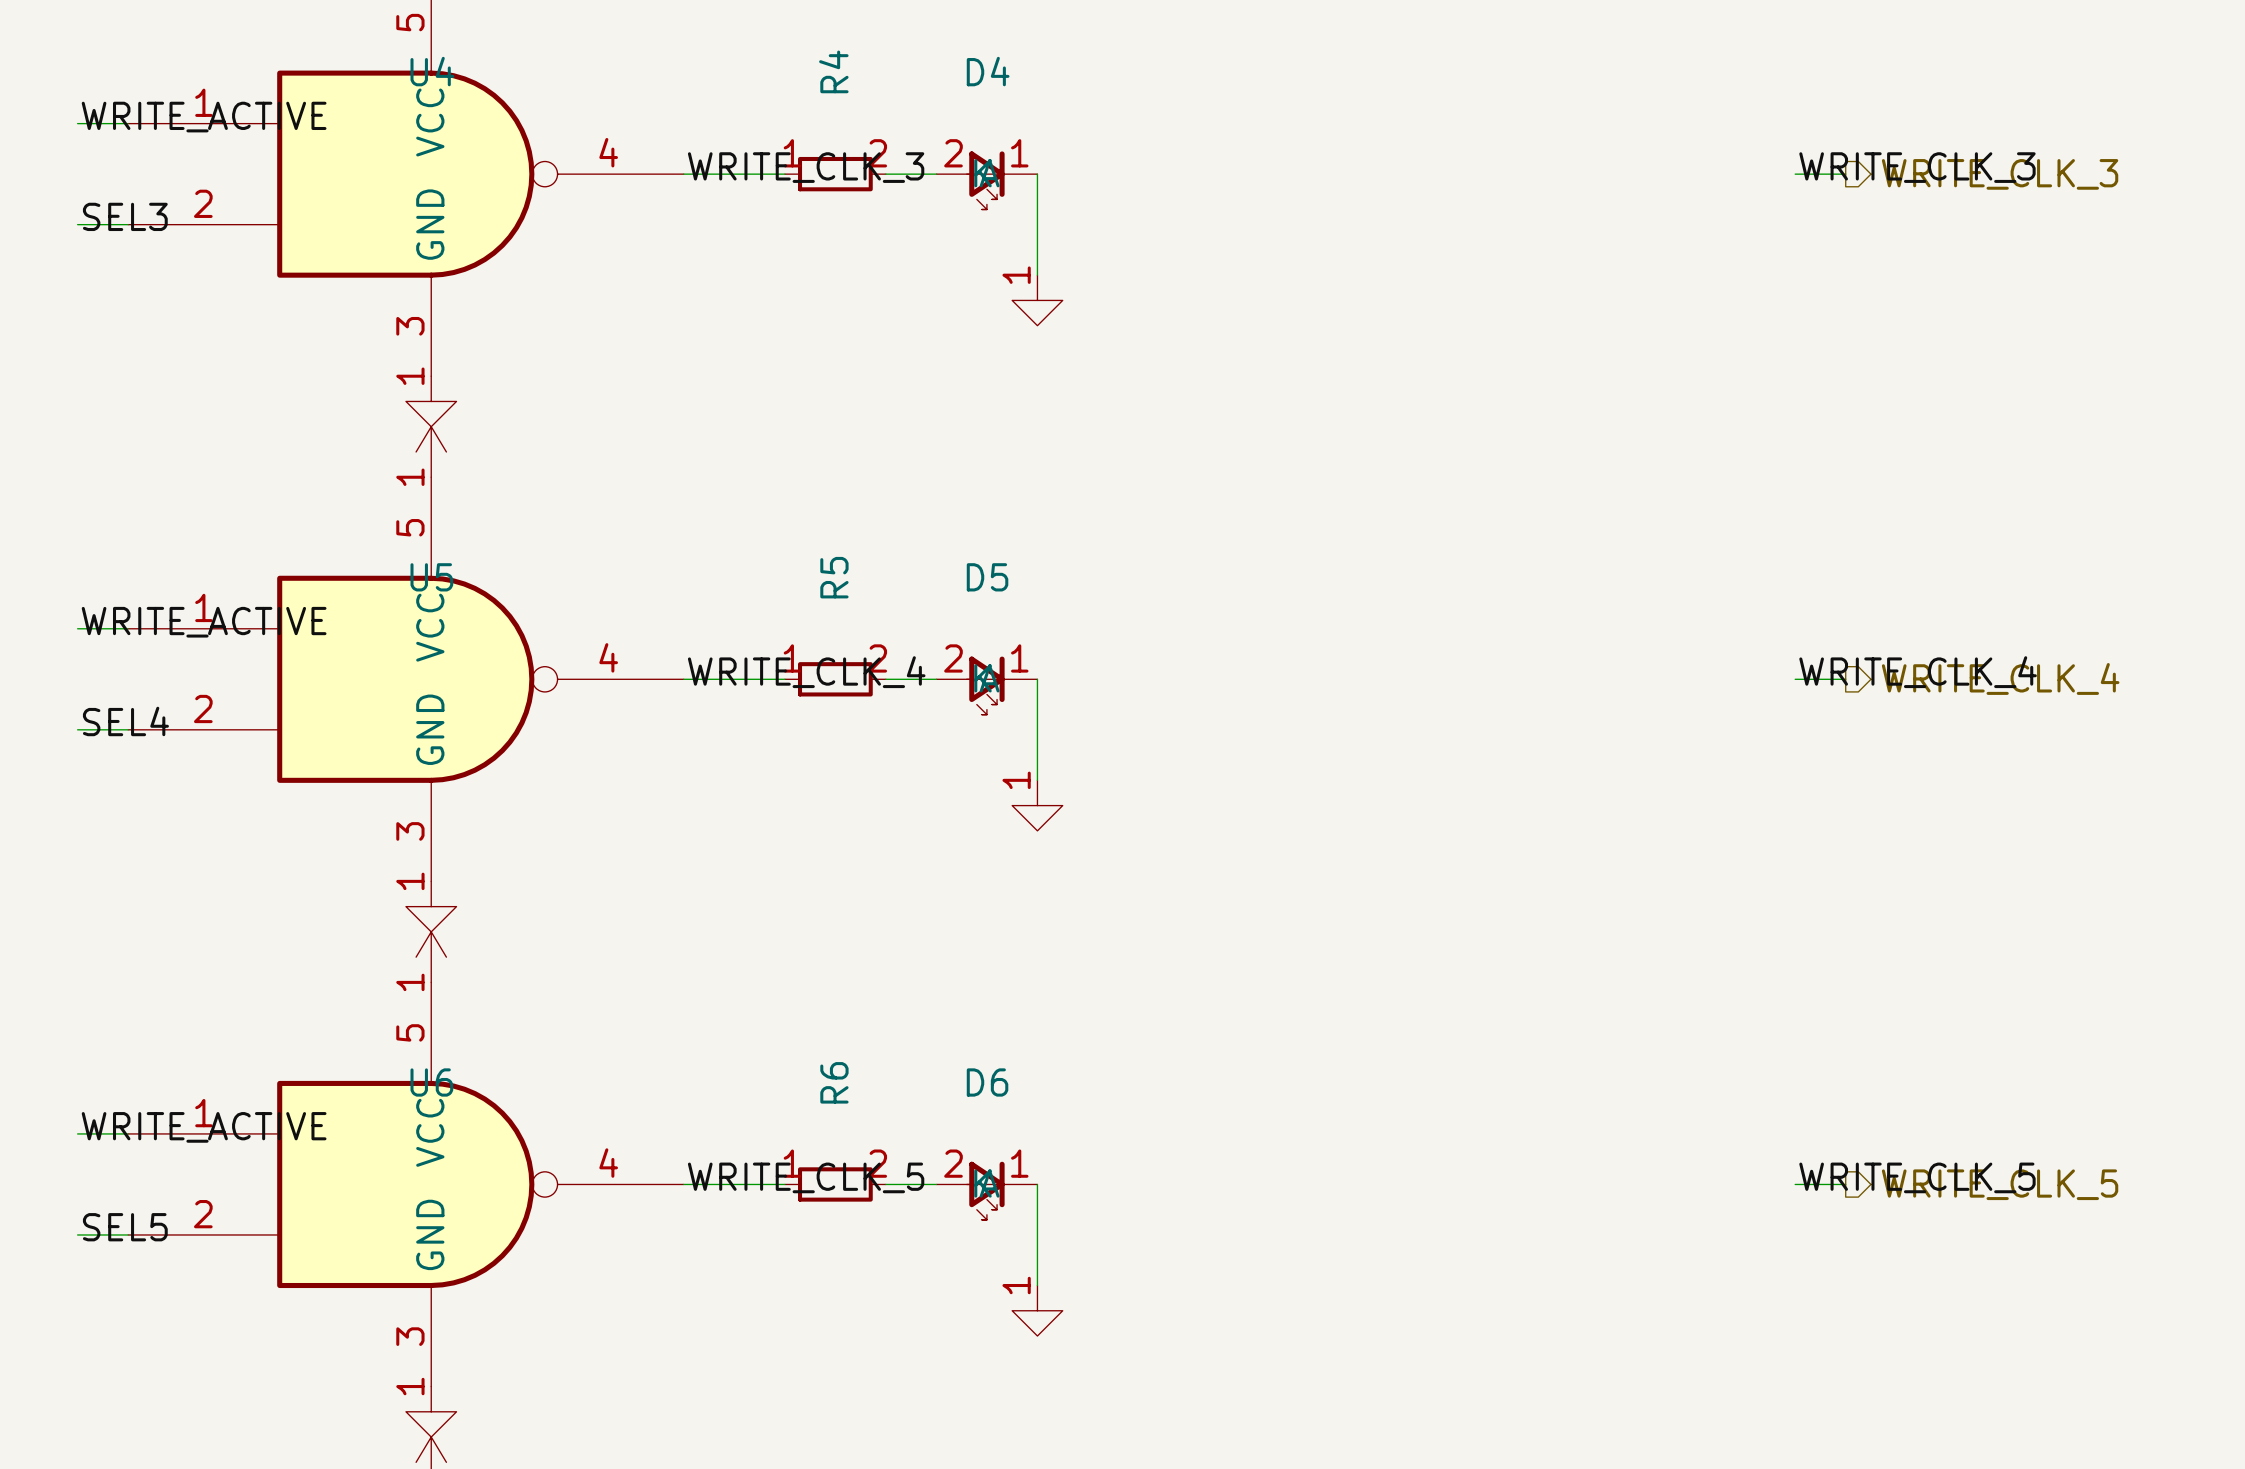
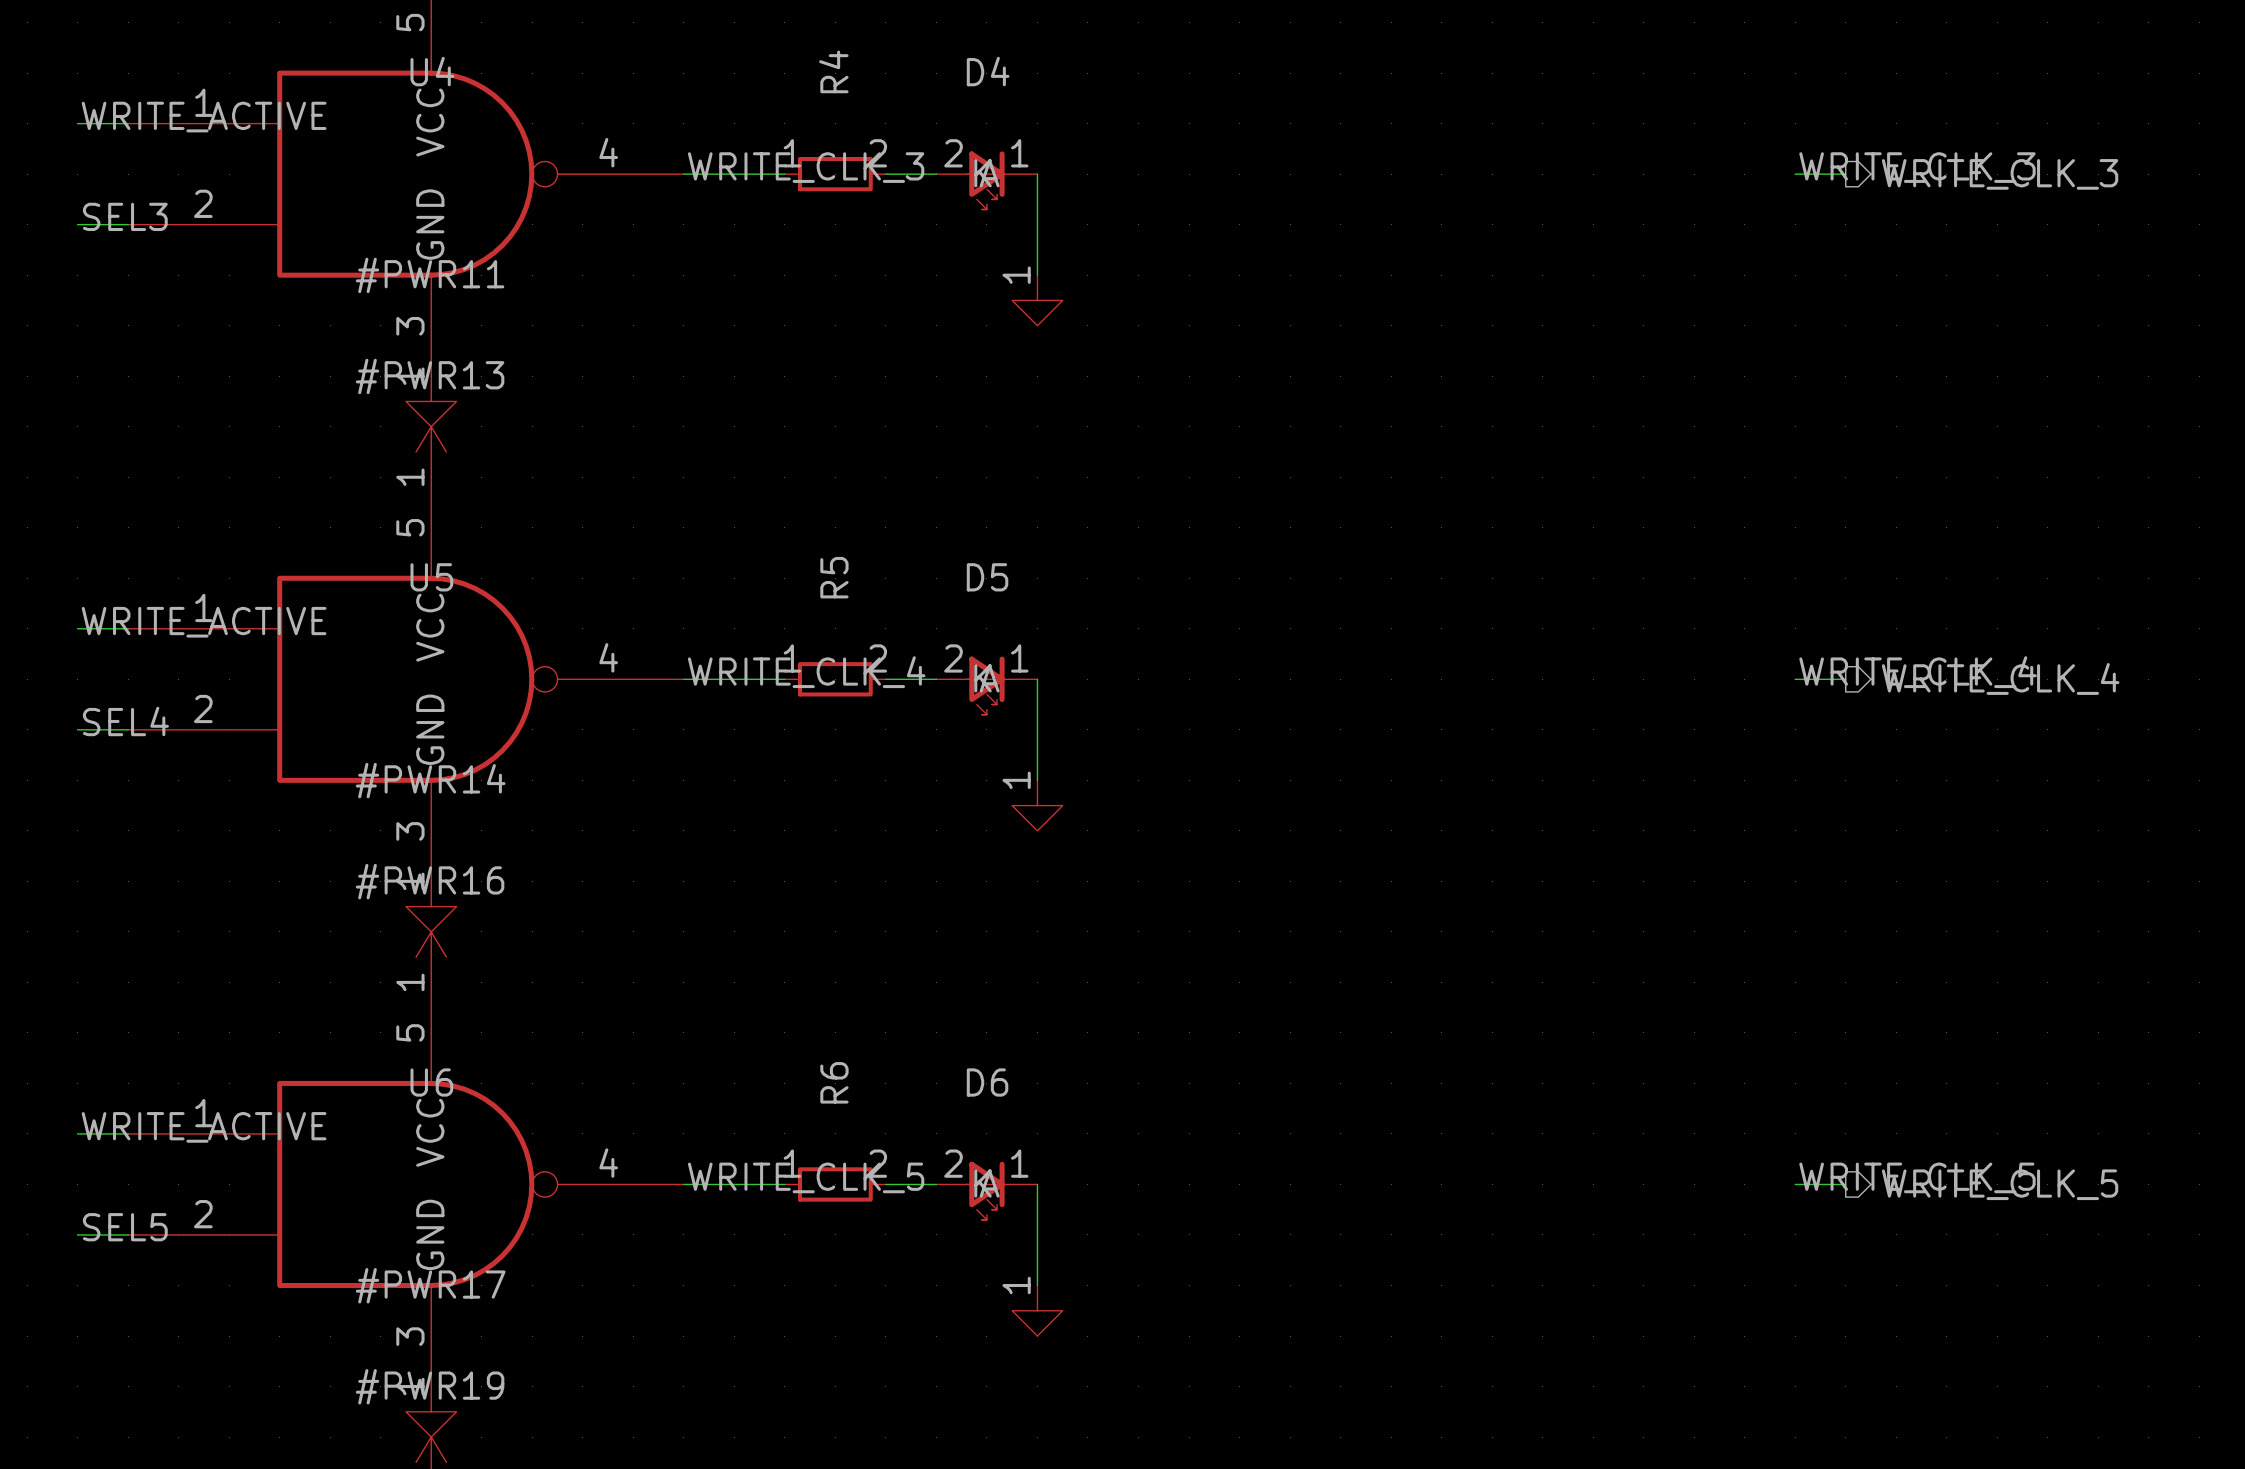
#PWR11 name: none -> #PWR11 (430, 275)
#PWR13 name: none -> #PWR13 (430, 376)
#PWR14 name: none -> #PWR14 (430, 780)
#PWR16 name: none -> #PWR16 (430, 881)
#PWR17 name: none -> #PWR17 (430, 1285)
#PWR19 name: none -> #PWR19 (430, 1386)

